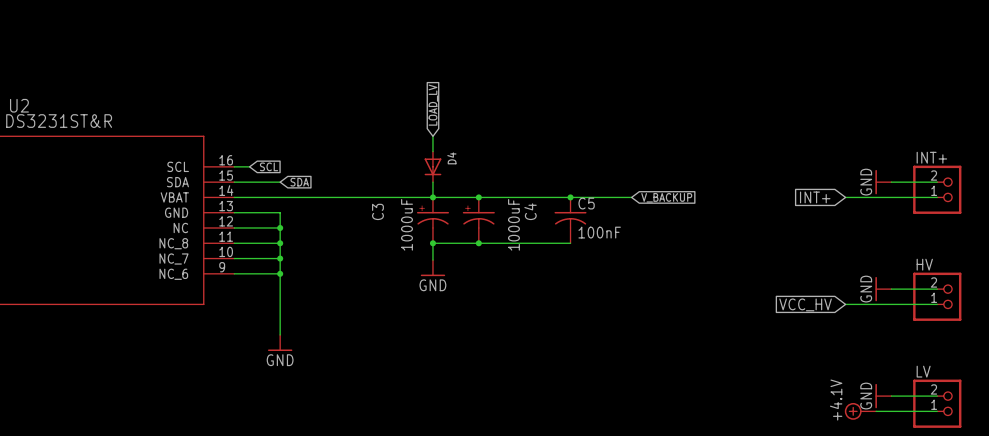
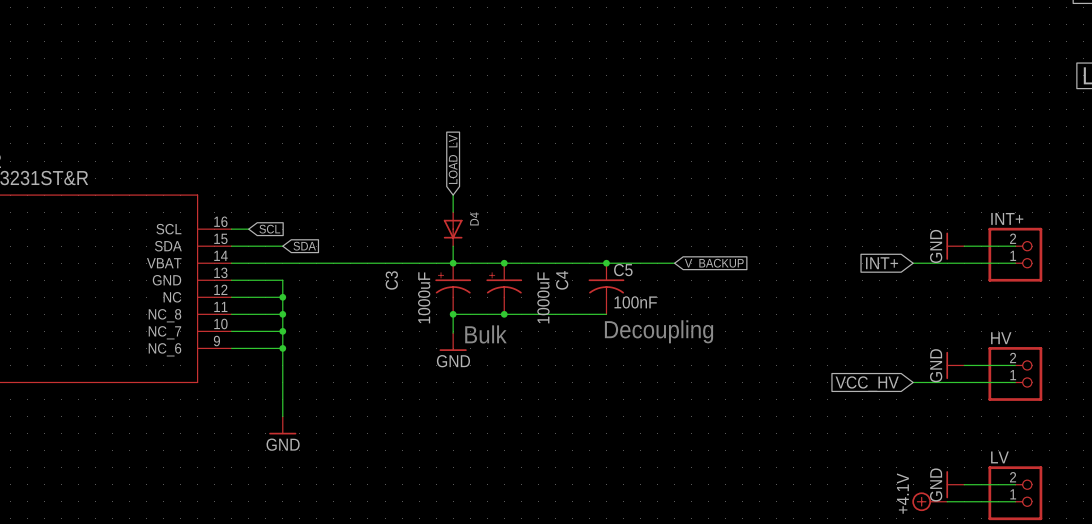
text: none -> Decoupling (659, 331)
text: none -> Bulk (485, 334)

